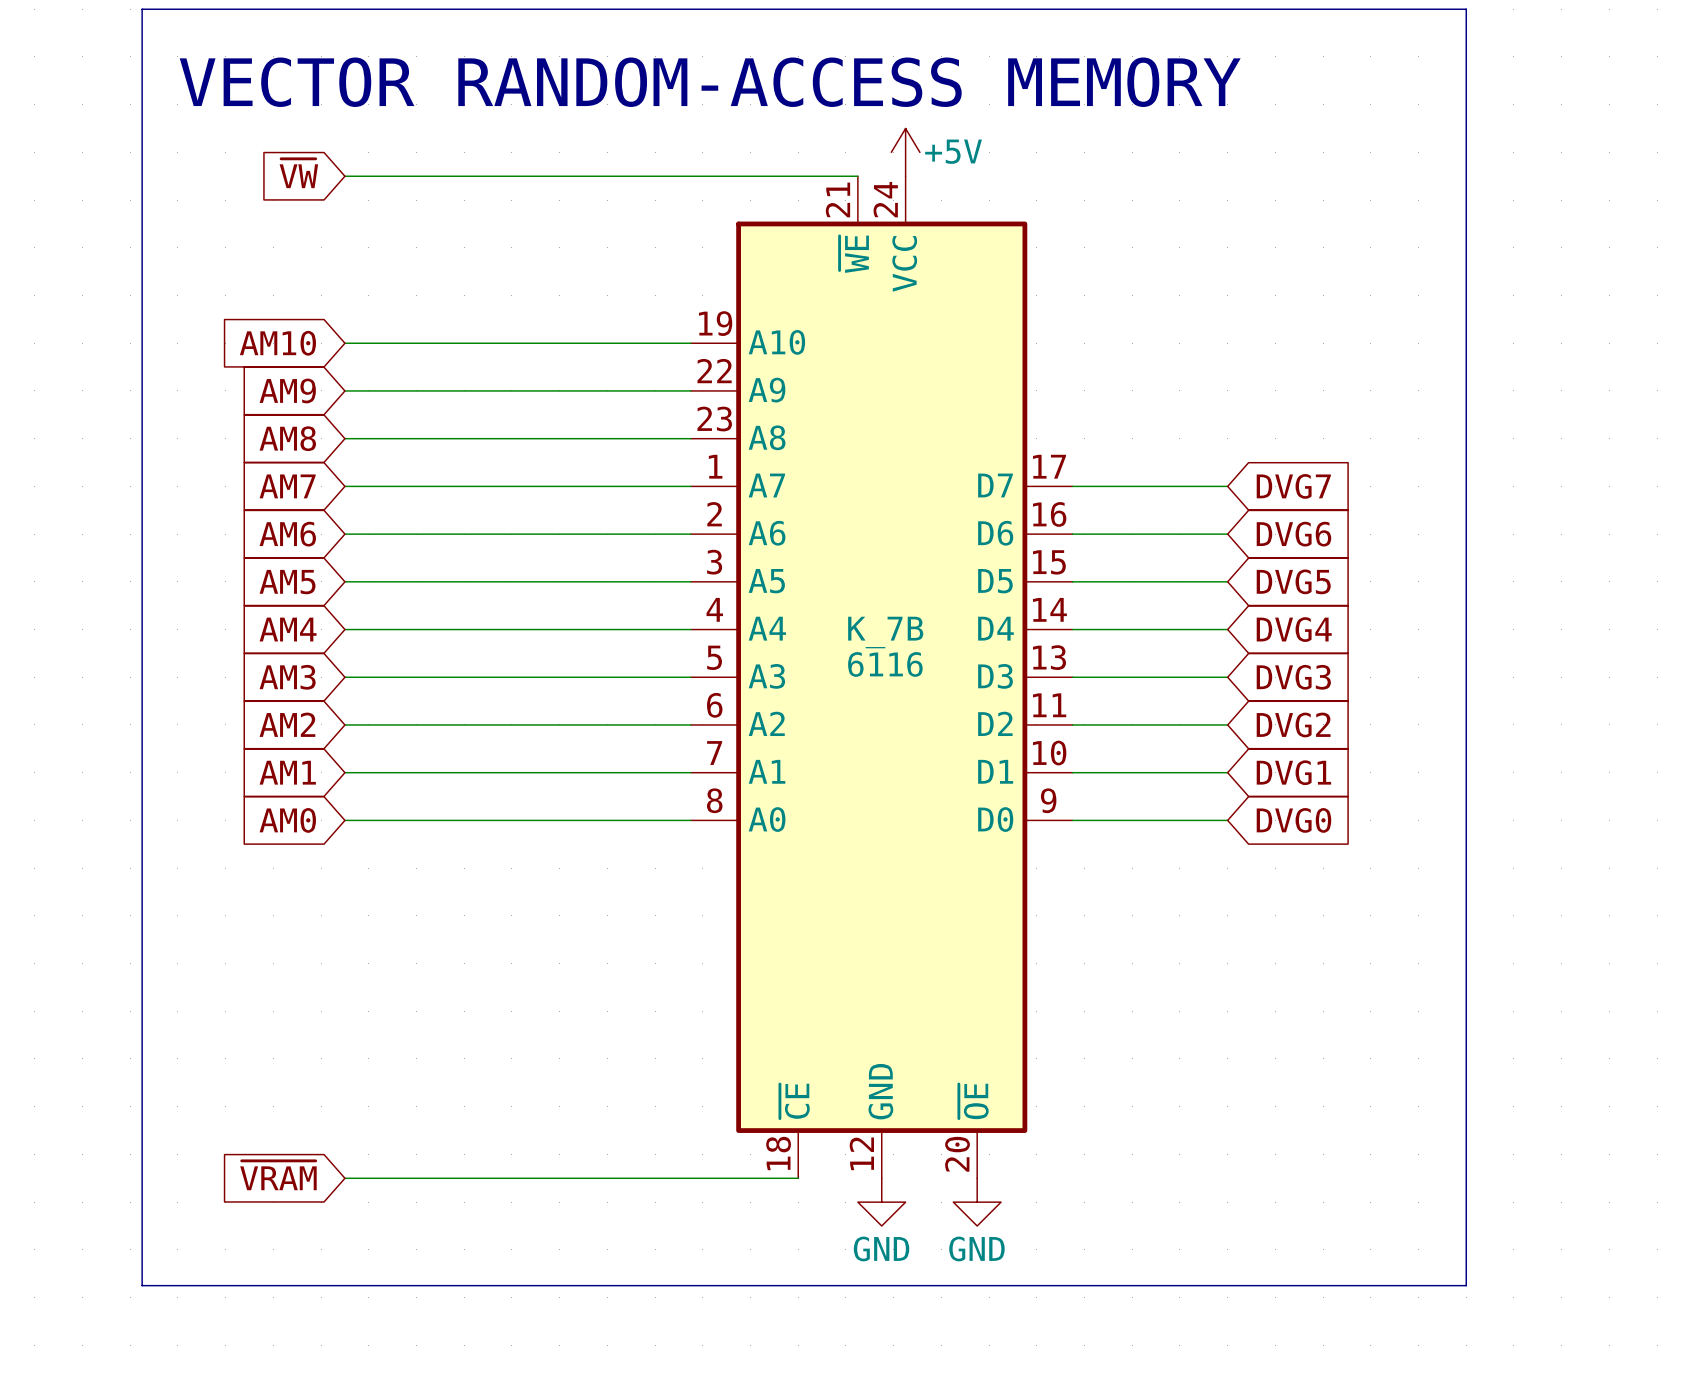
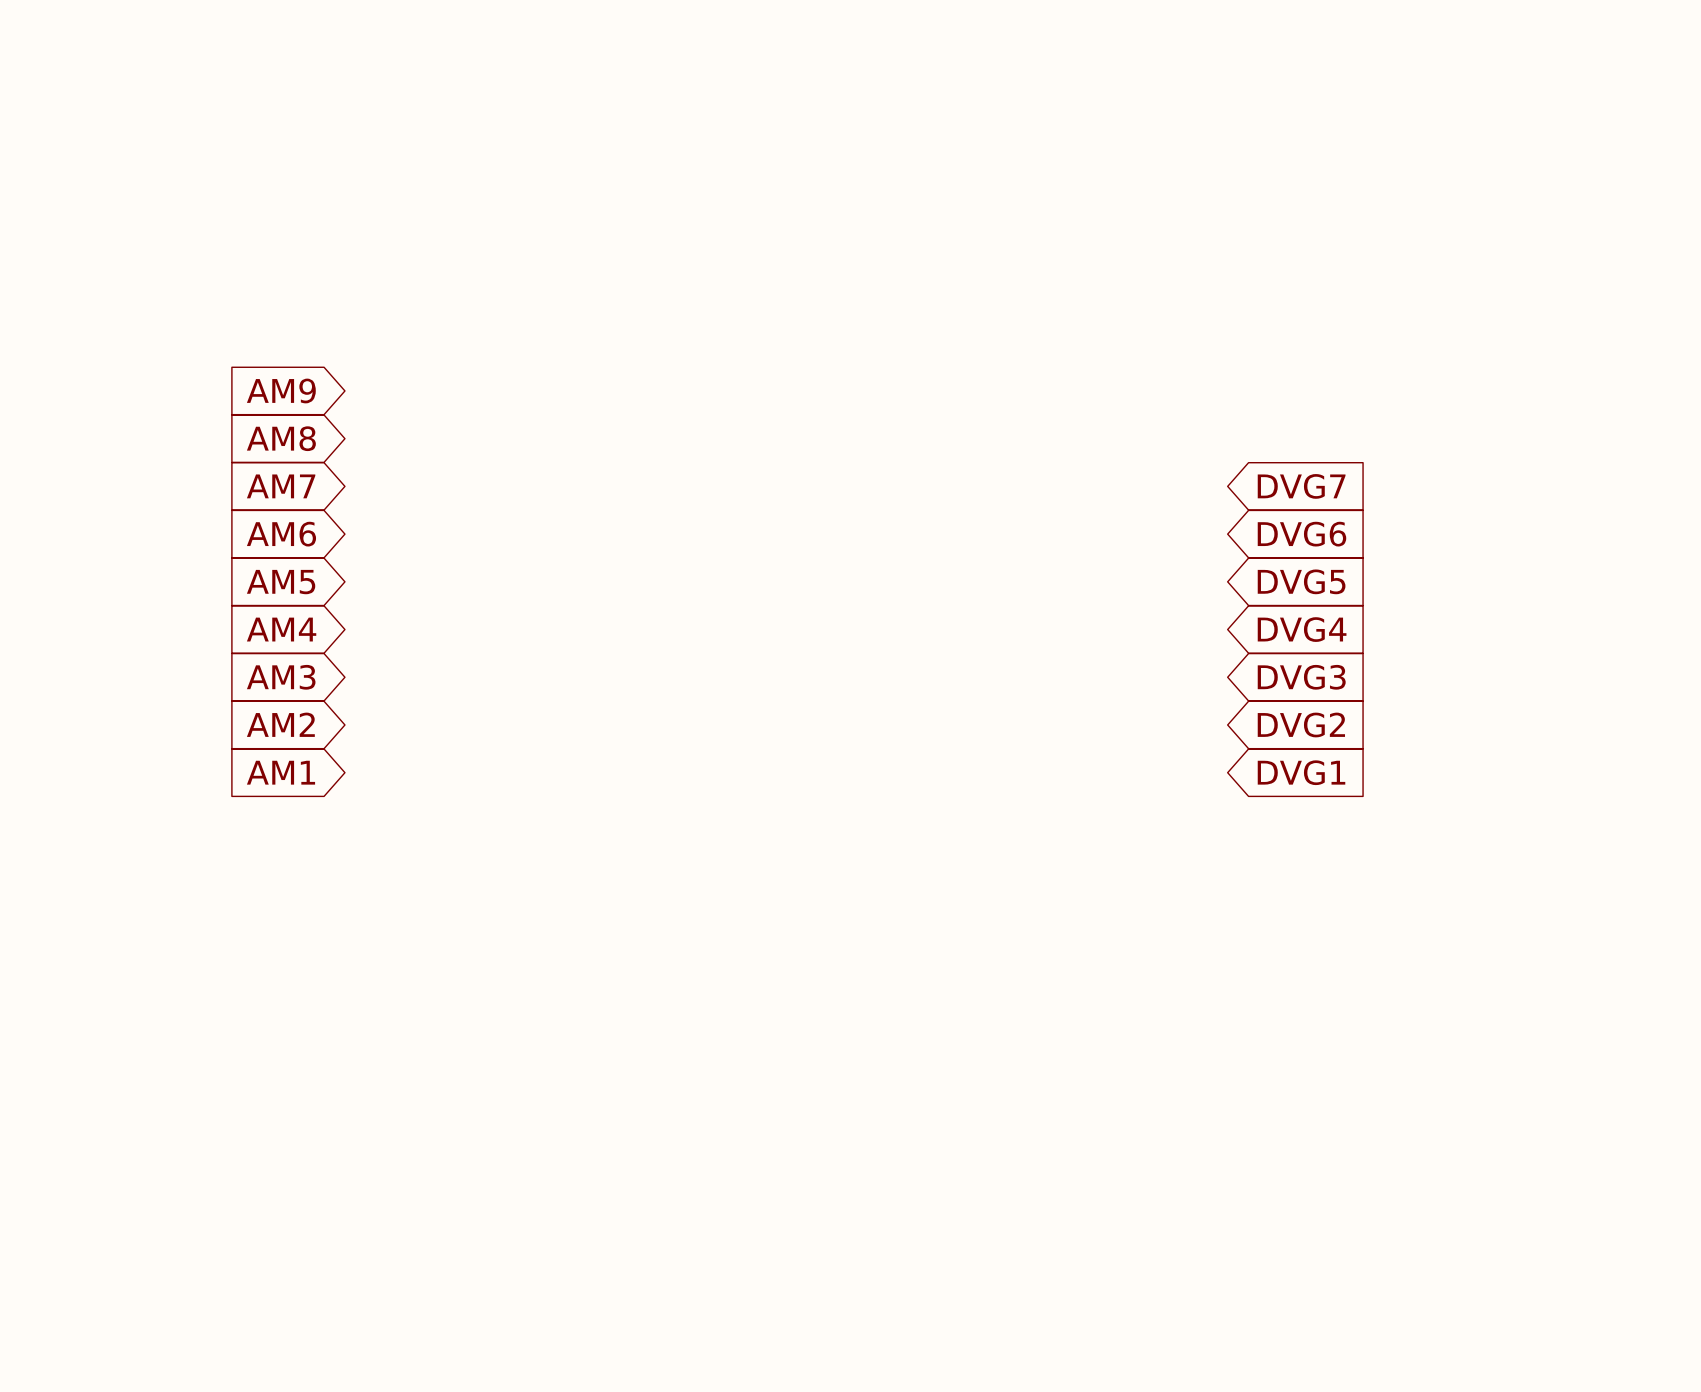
line: (142, 9) (142, 1285) (1466, 1285) (1466, 9) (142, 9) -> none
text: VECTOR RANDOM-ACCESS MEMORY (710, 82) -> none
power symbol: +5V (905, 152) -> none
global label: ~{VW} (298, 173) -> none
wire: (344, 176) (857, 176) -> none
global label: AM10 (277, 343) -> none
wire: (344, 343) (690, 343) -> none
wire: (344, 390) (690, 390) -> none
wire: (344, 438) (690, 438) -> none
wire: (344, 486) (690, 486) -> none
wire: (1072, 486) (1227, 486) -> none
wire: (344, 534) (690, 534) -> none
wire: (1072, 534) (1227, 534) -> none
wire: (344, 581) (690, 581) -> none
wire: (1072, 581) (1227, 581) -> none
wire: (344, 629) (690, 629) -> none
wire: (1072, 629) (1227, 629) -> none
wire: (344, 677) (690, 677) -> none
K_7B: 6116 (881, 677) -> none
wire: (1072, 677) (1227, 677) -> none
wire: (344, 724) (690, 724) -> none
wire: (1072, 724) (1227, 724) -> none
wire: (344, 772) (690, 772) -> none
wire: (1072, 772) (1227, 772) -> none
global label: AM0 (287, 820) -> none
wire: (344, 820) (690, 820) -> none
wire: (1072, 820) (1227, 820) -> none
global label: DVG0 (1293, 820) -> none
global label: ~{VRAM} (278, 1175) -> none
wire: (344, 1178) (798, 1178) -> none
power symbol: GND (881, 1202) -> none
power symbol: GND (977, 1202) -> none

